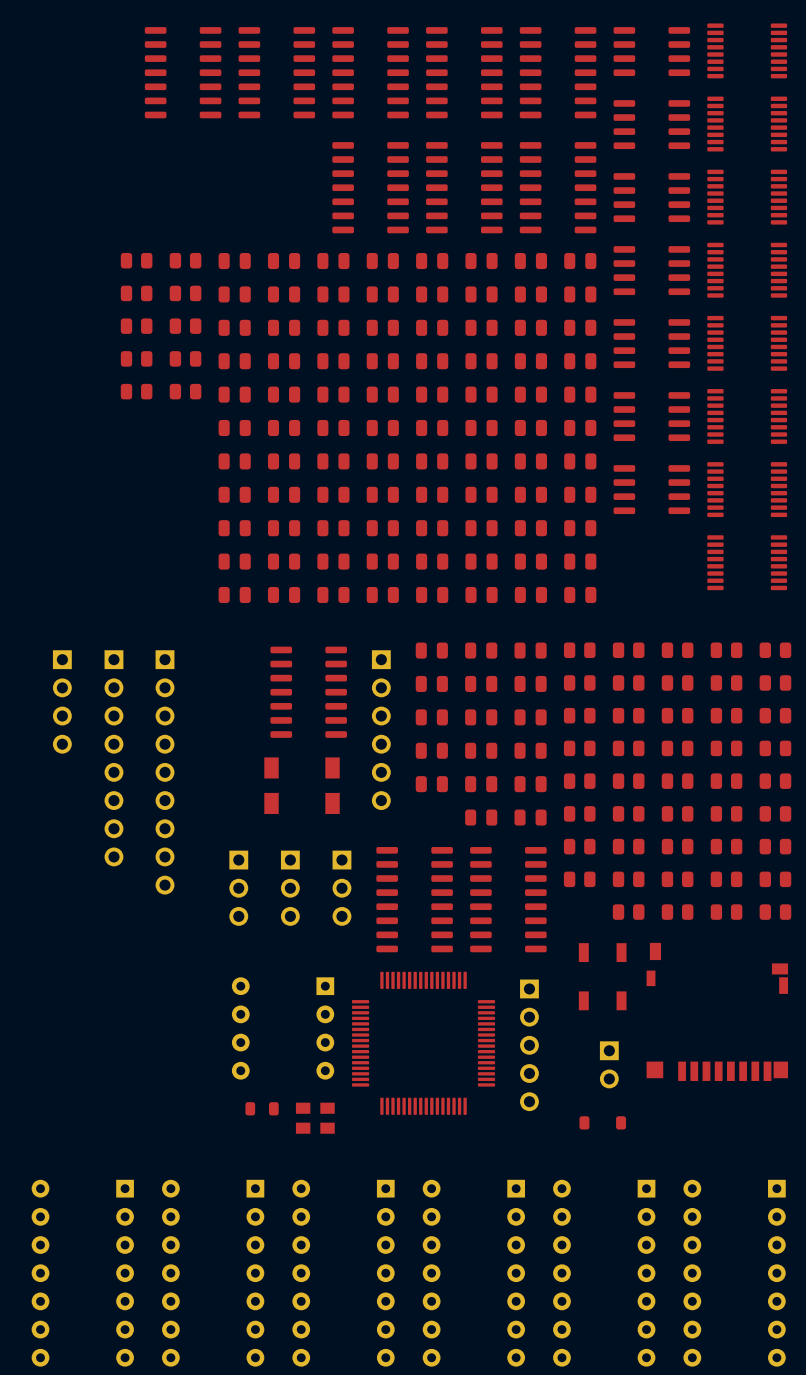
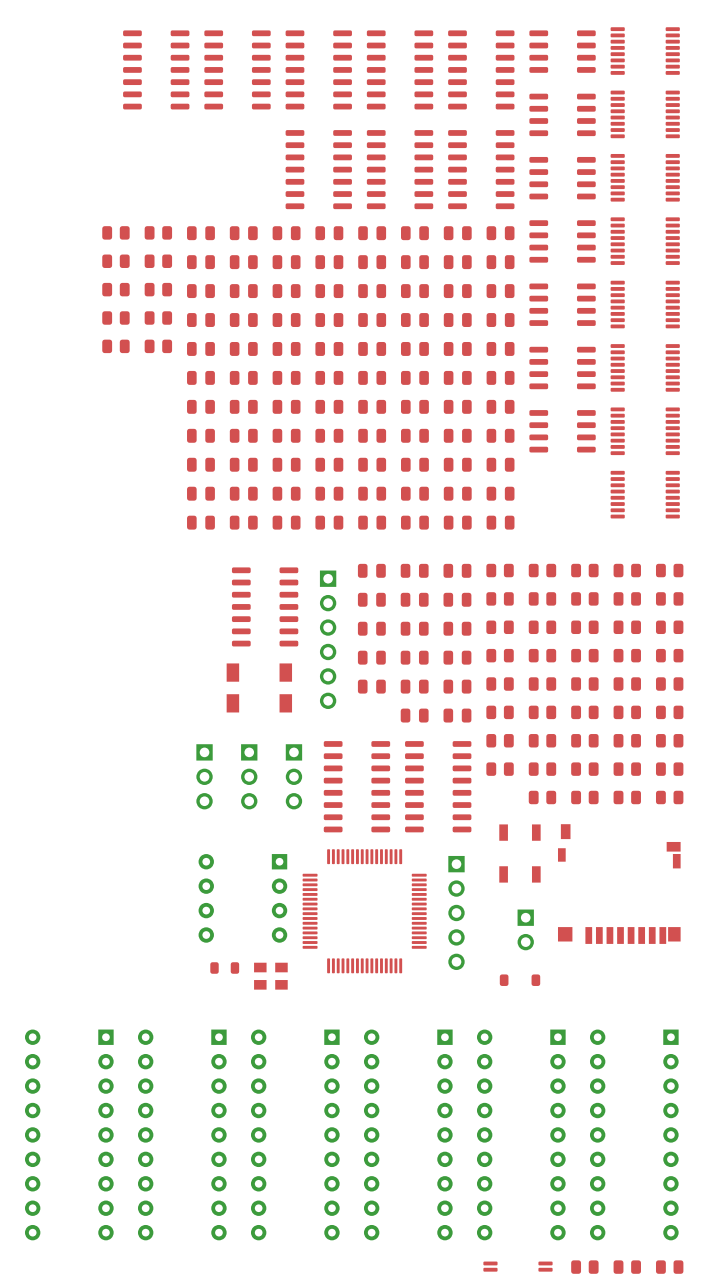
part: (62, 701) -> none
part: (113, 758) -> none
part: (165, 772) -> none

